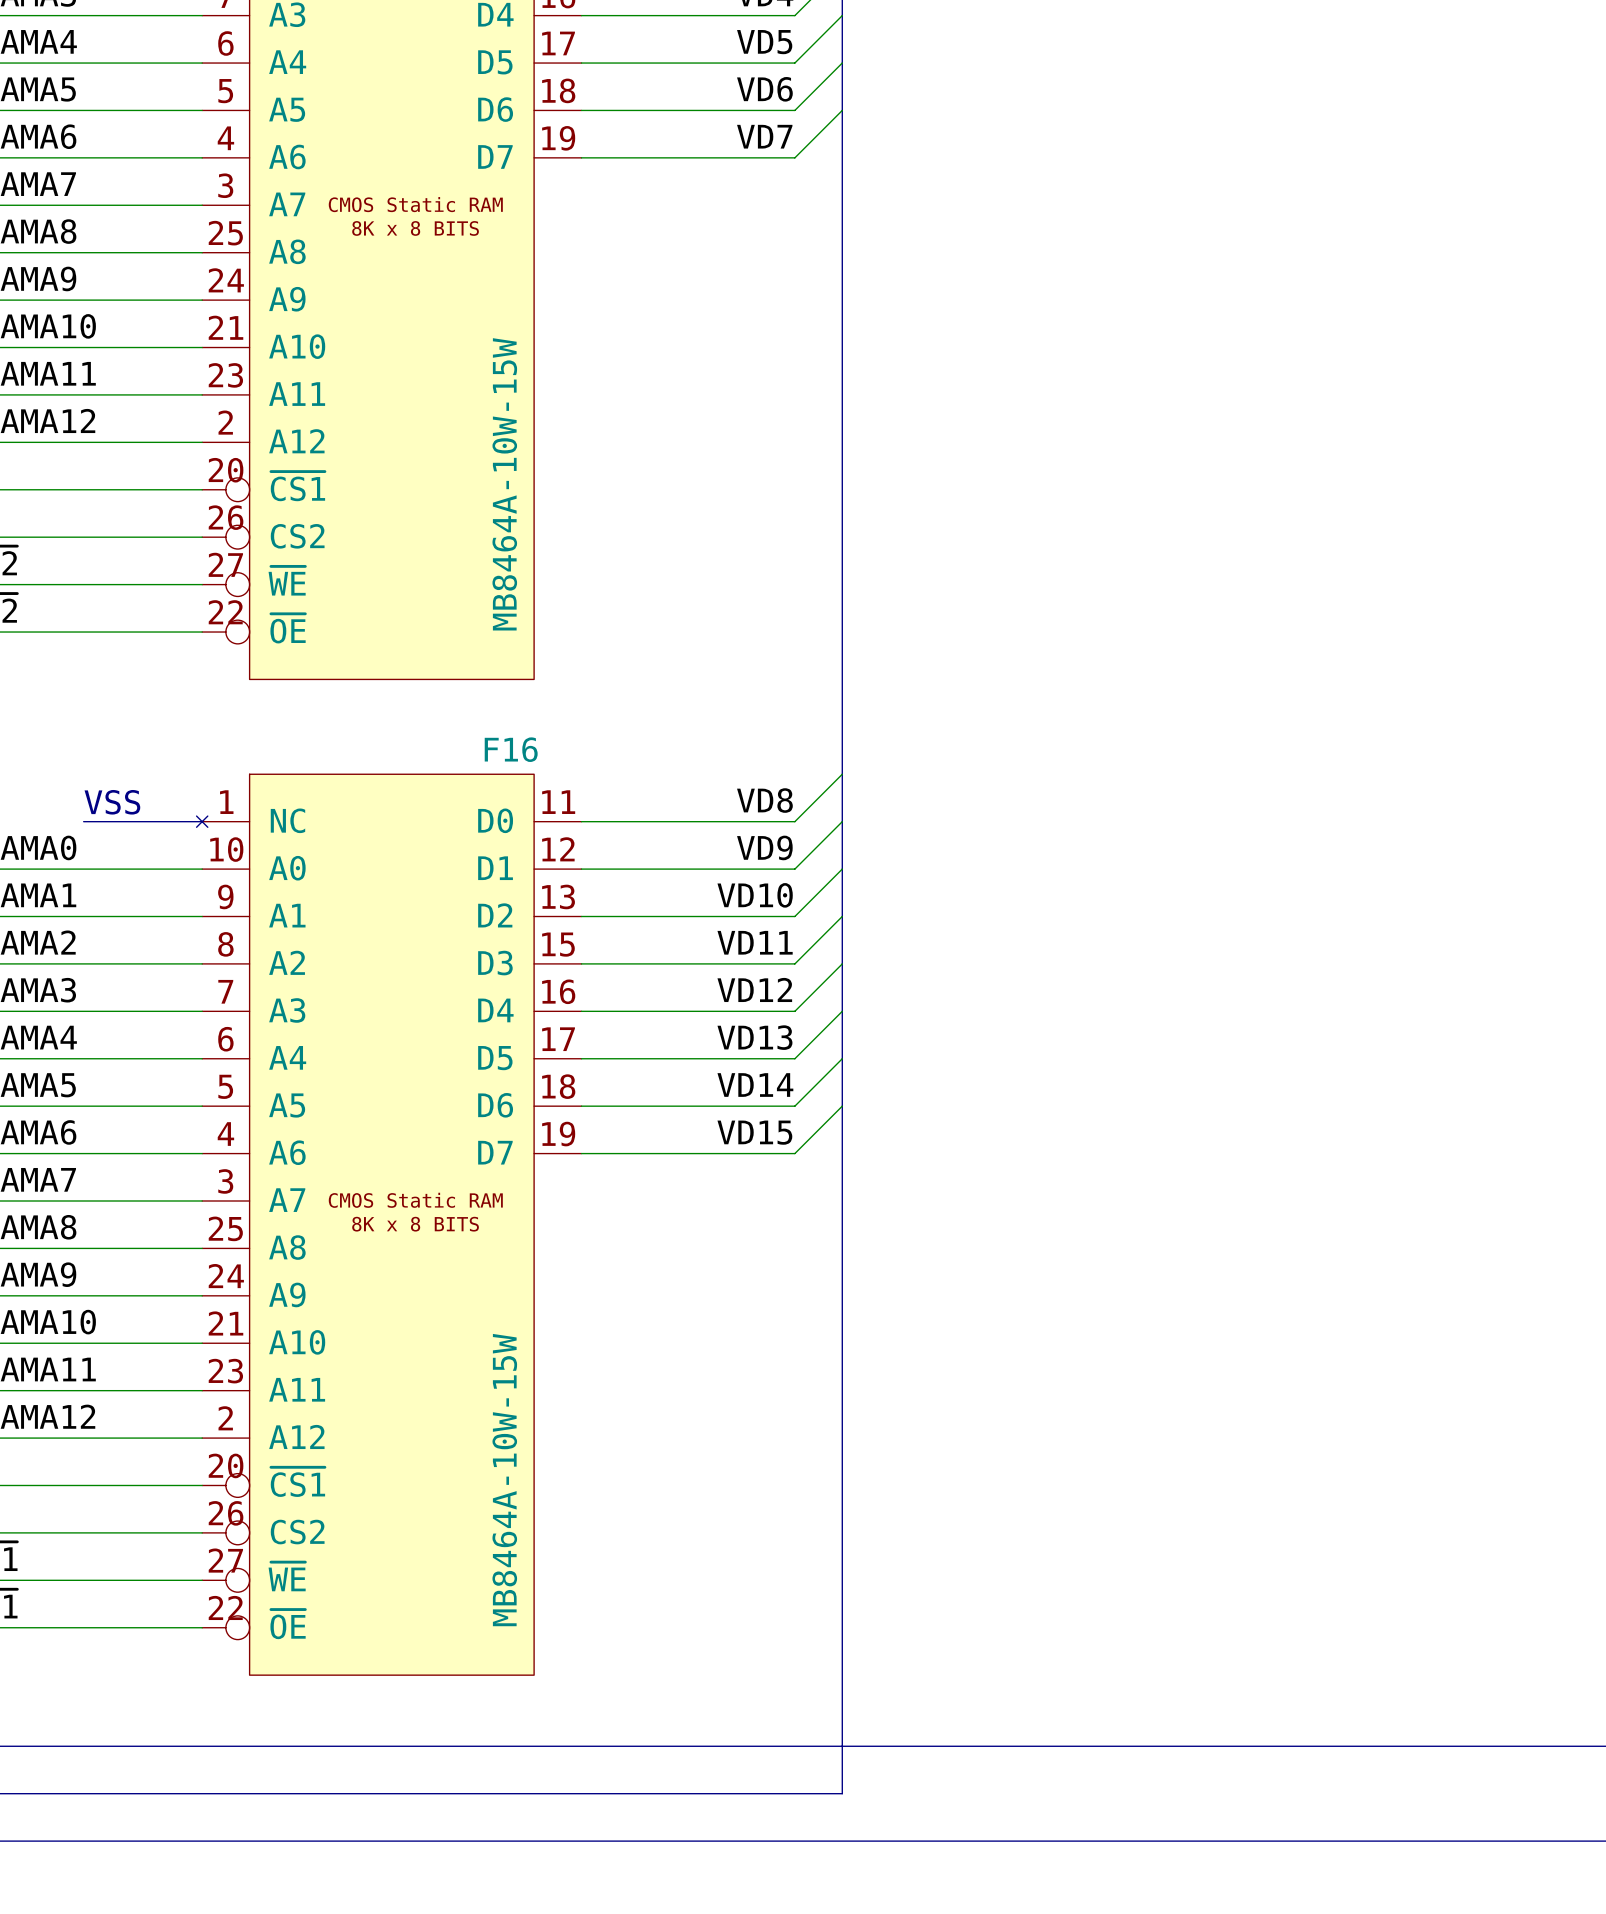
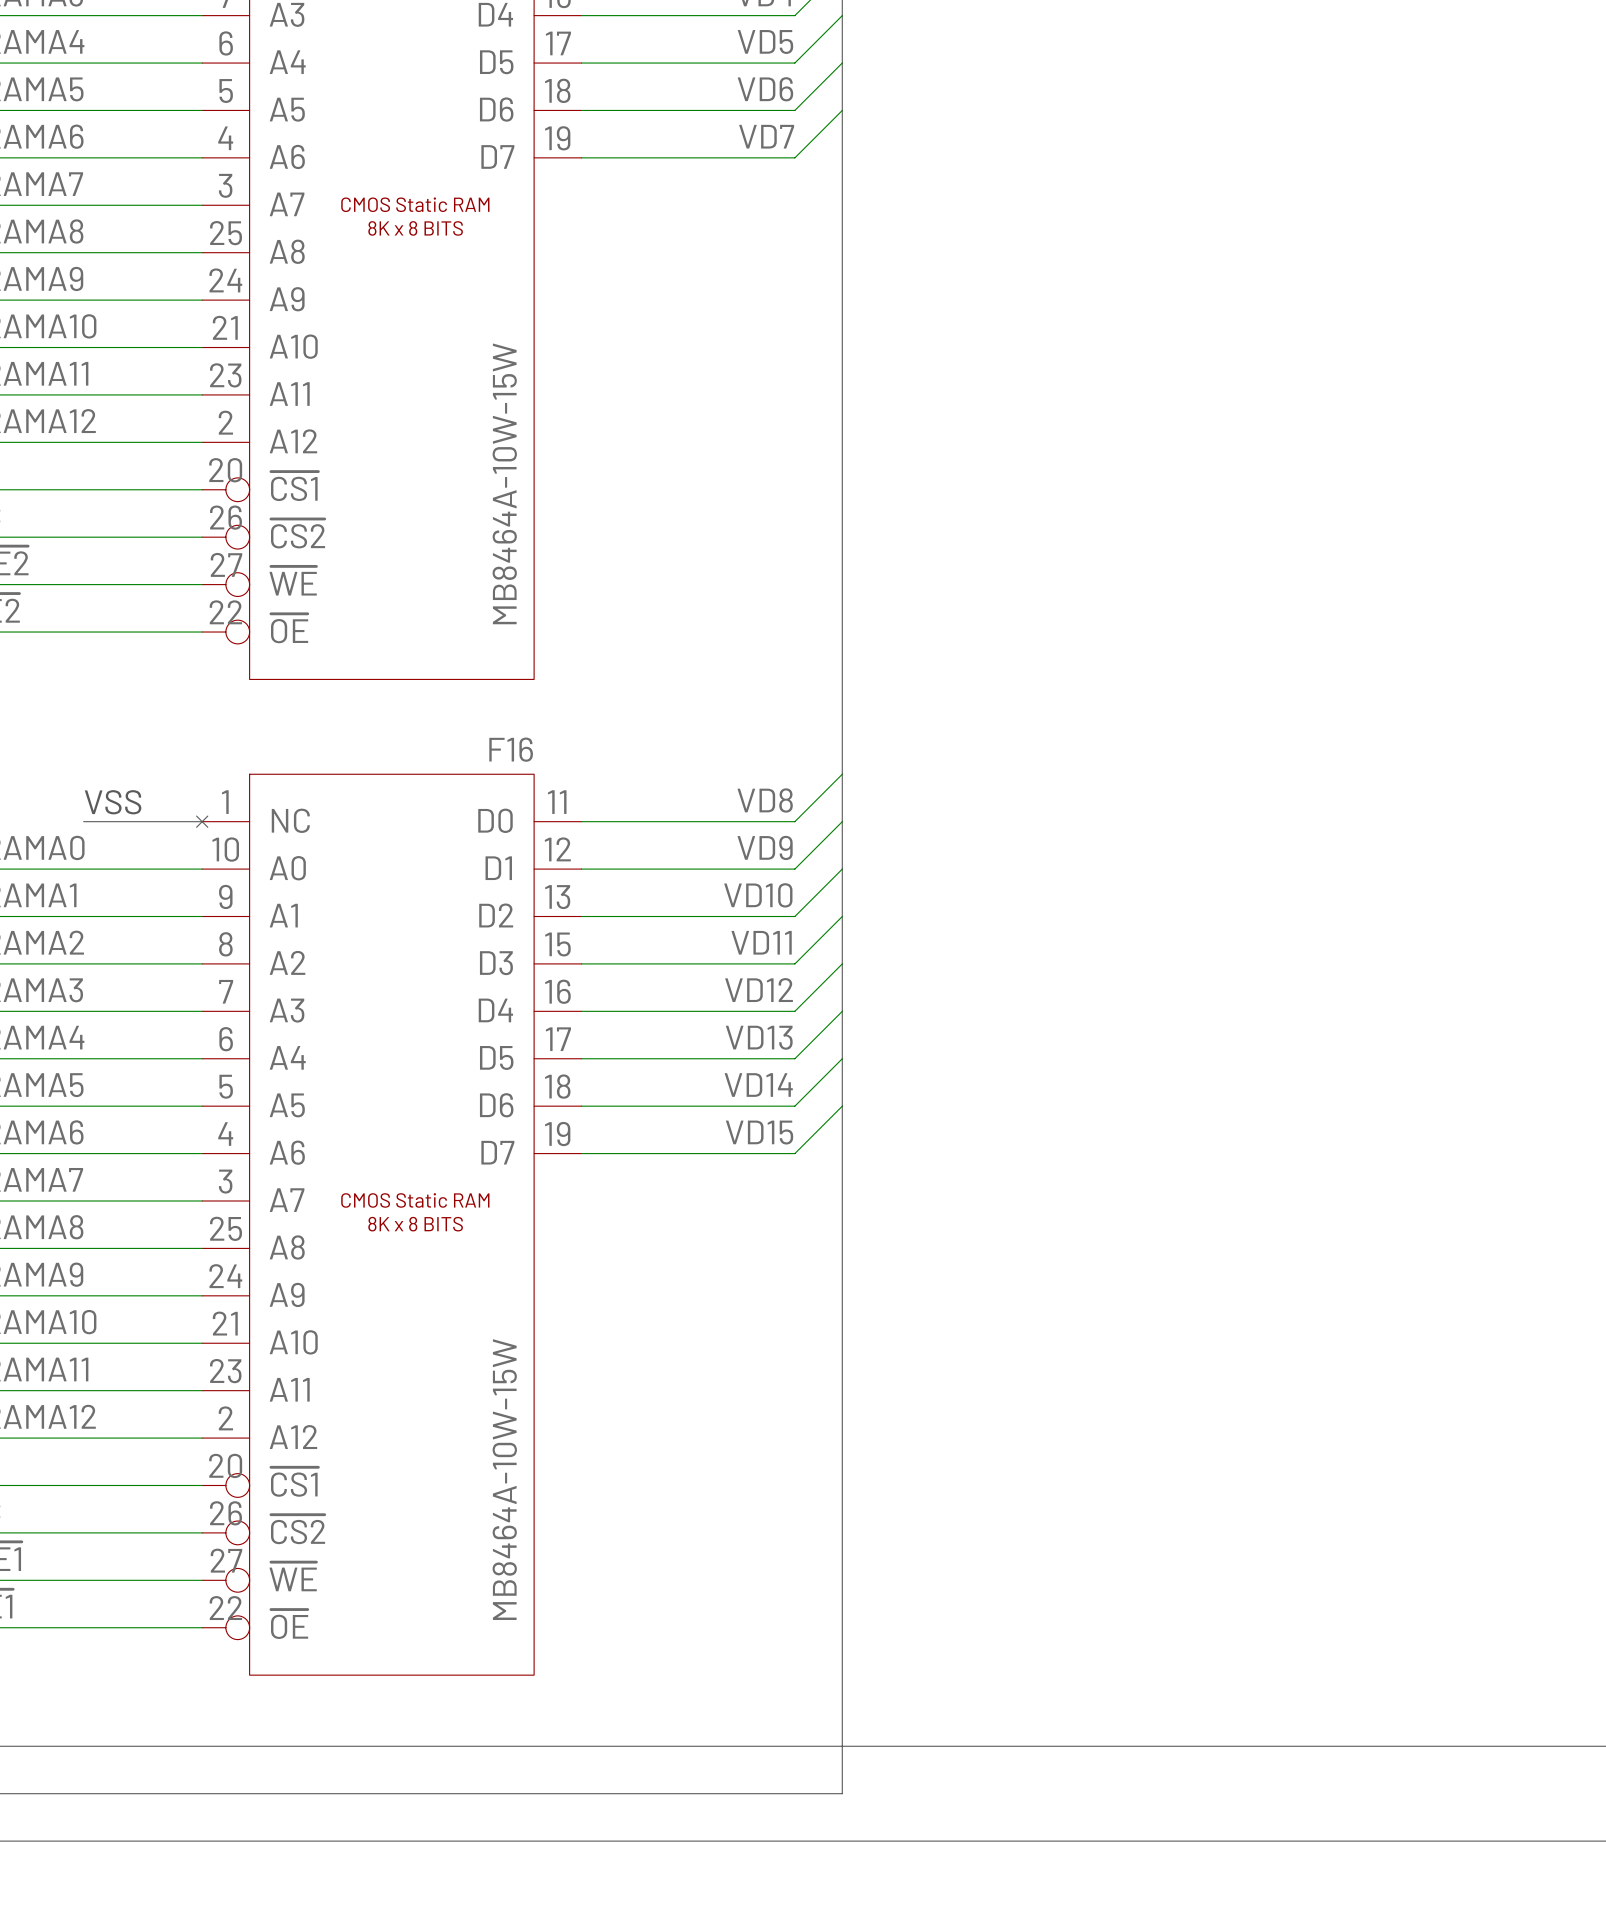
part pin name: CS2 (297, 536) -> ~{CS2} (298, 533)
F16 pin name: CS2 (297, 1532) -> ~{CS2} (298, 1529)

